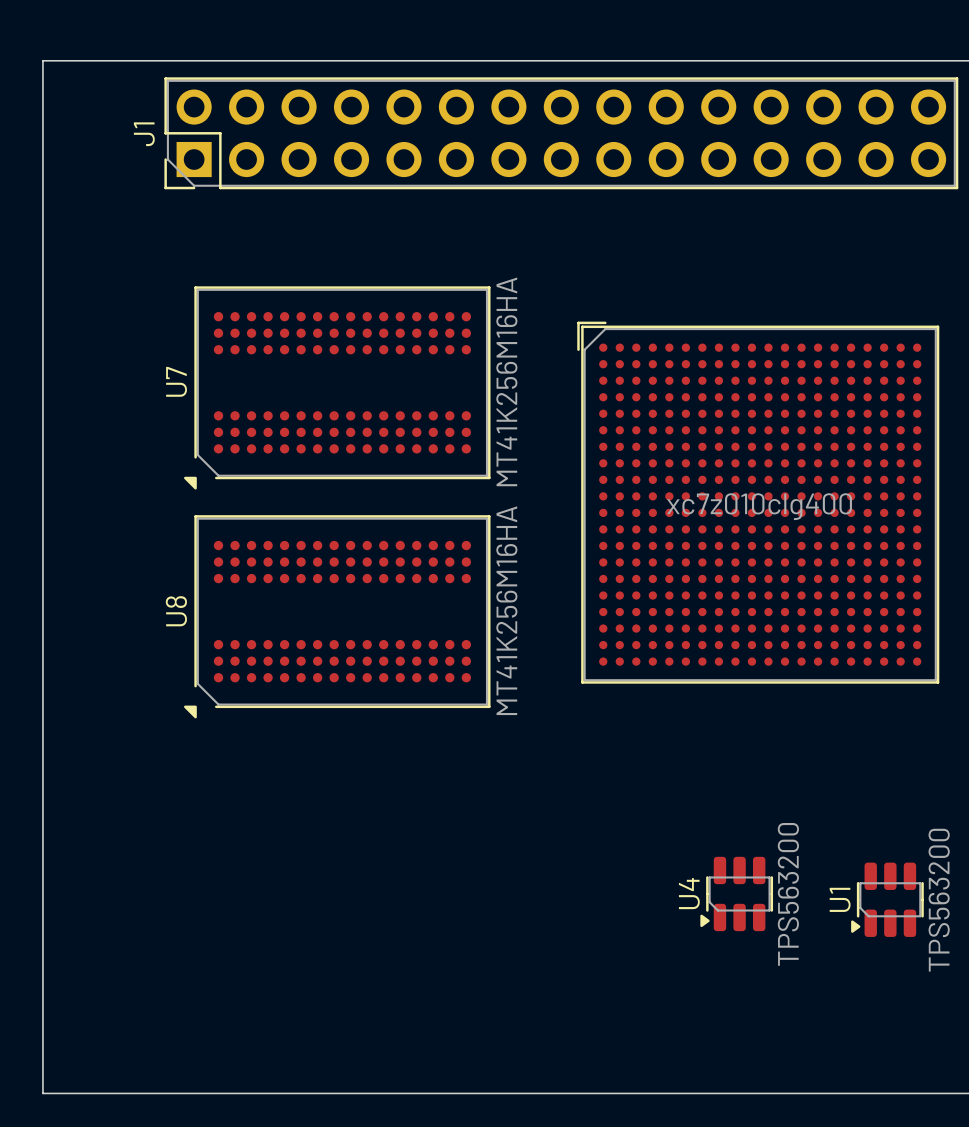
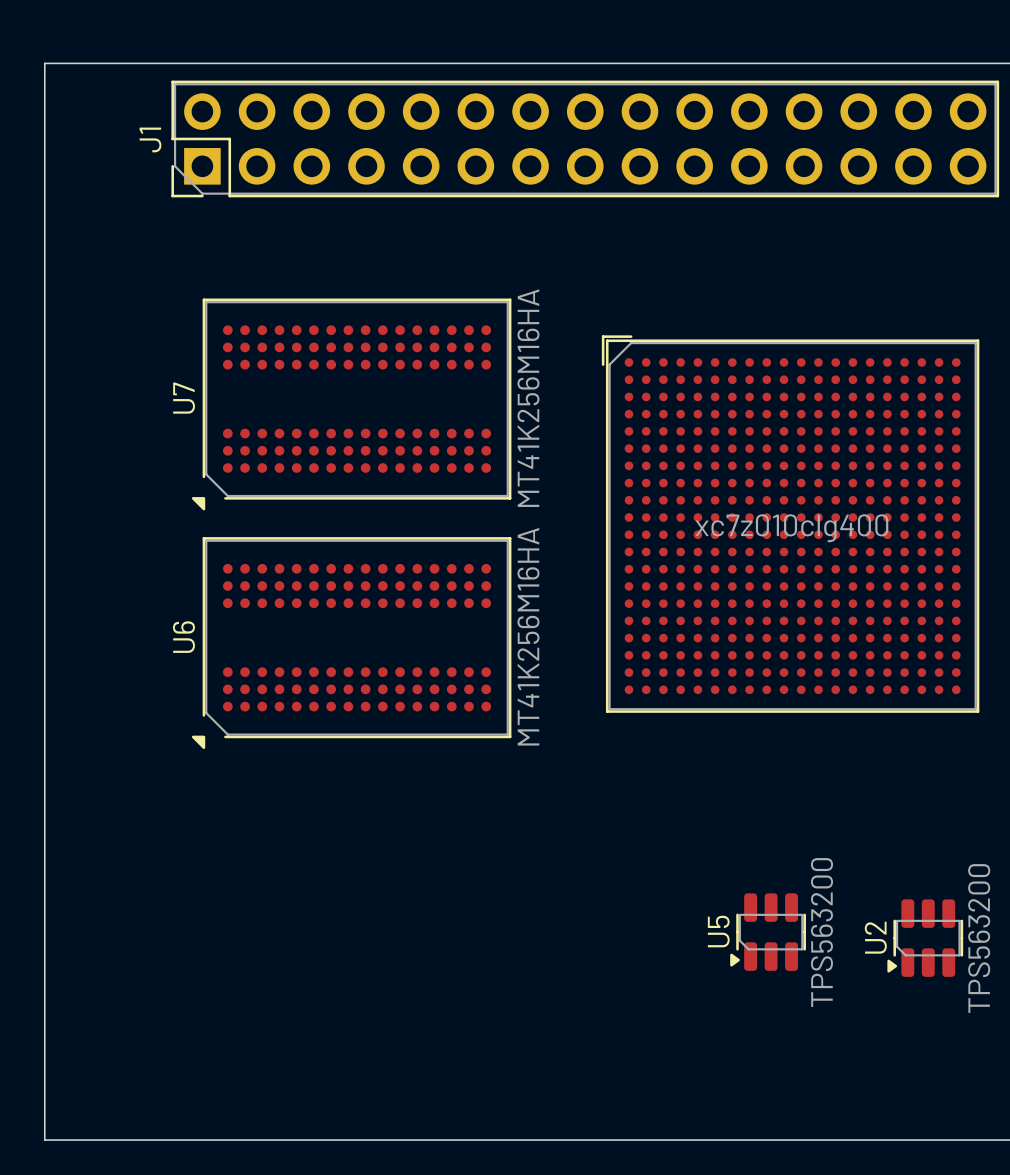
U8 name: U8 (176, 611) -> U6 (183, 637)
U4 name: U4 (689, 893) -> U5 (718, 931)
U1 name: U1 (840, 899) -> U2 (875, 937)

